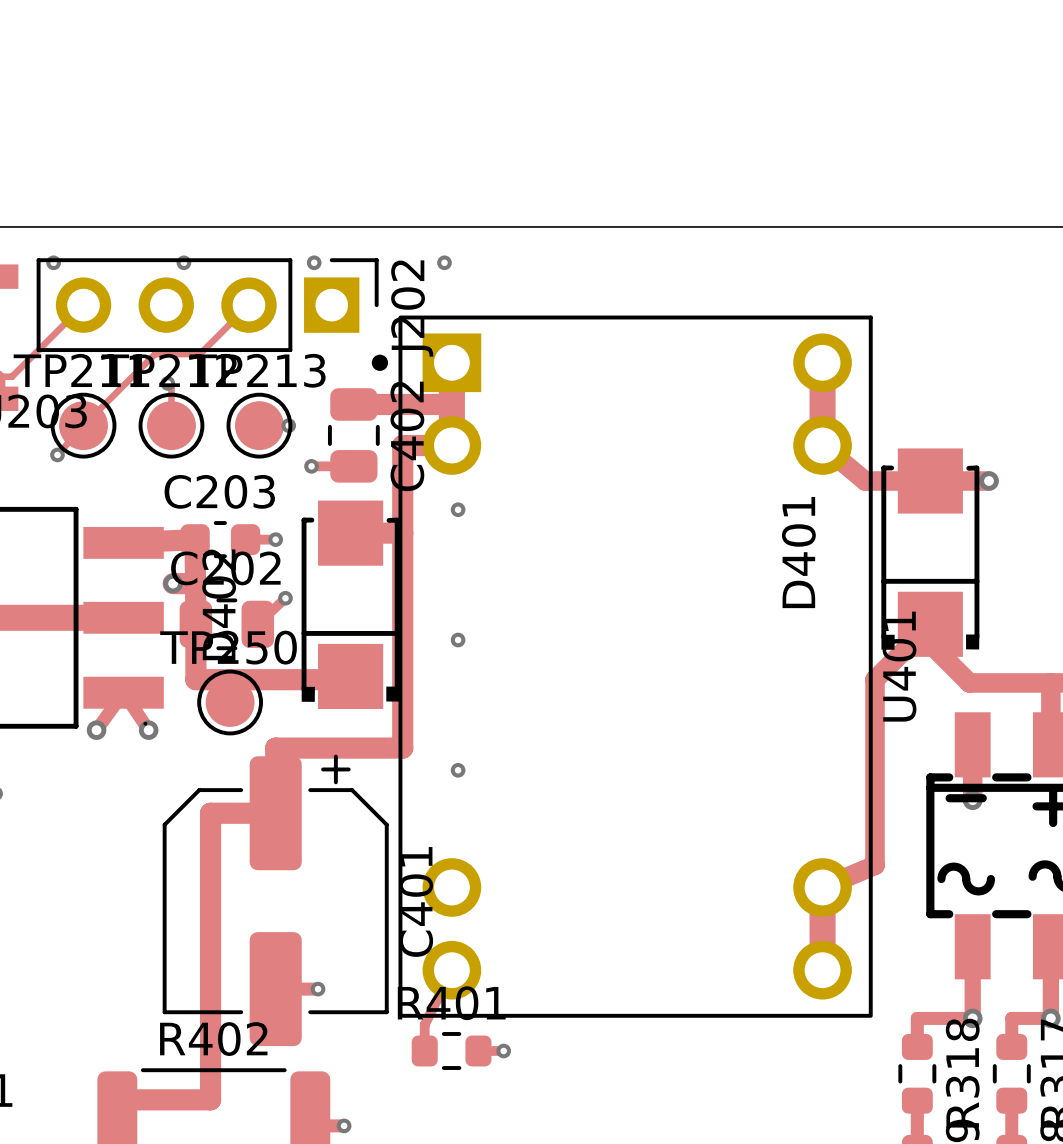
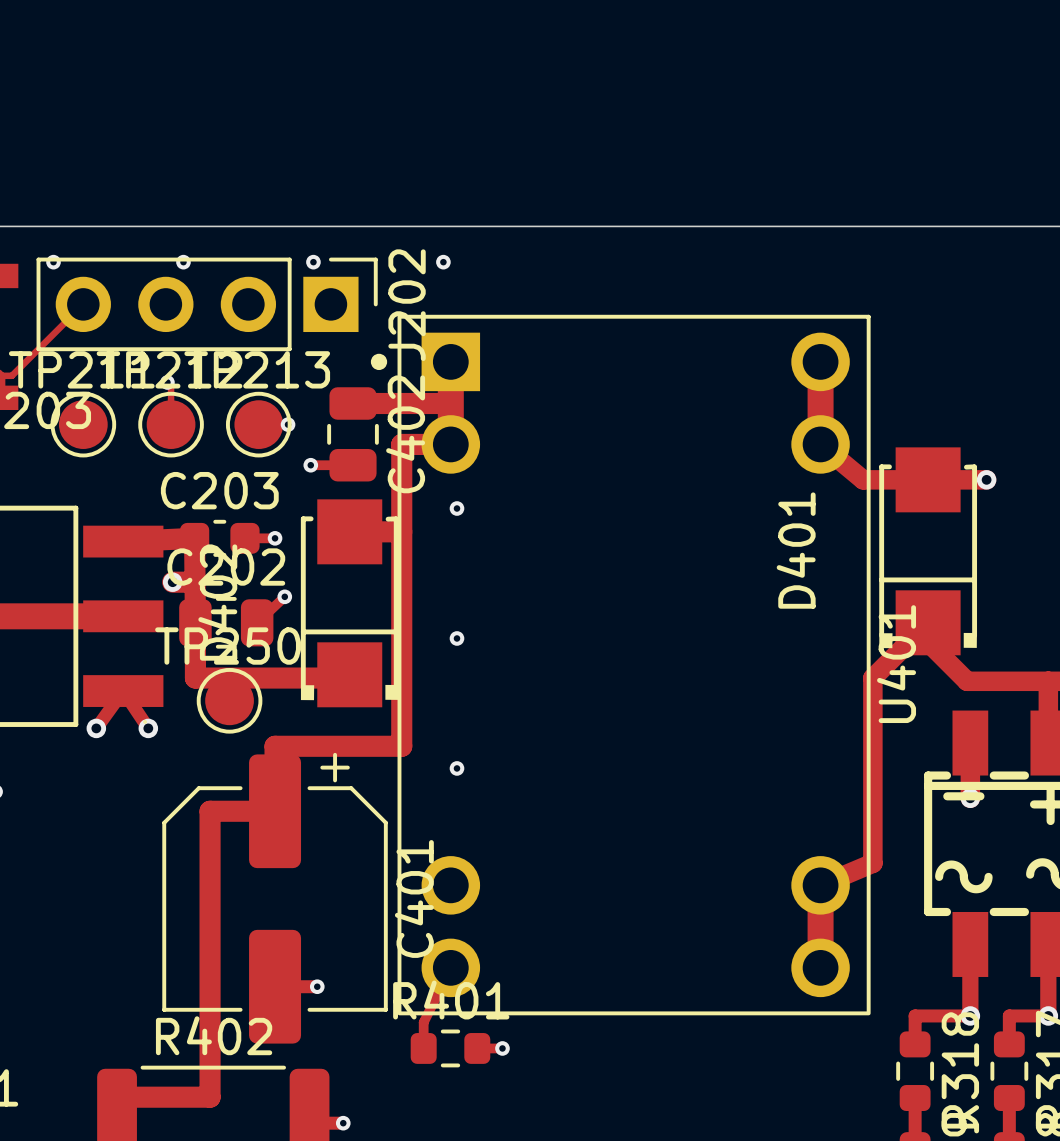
track: (248, 305) (200, 354) (155, 354) (83, 425) (57, 454) -> none
via: (57, 454) -> none

